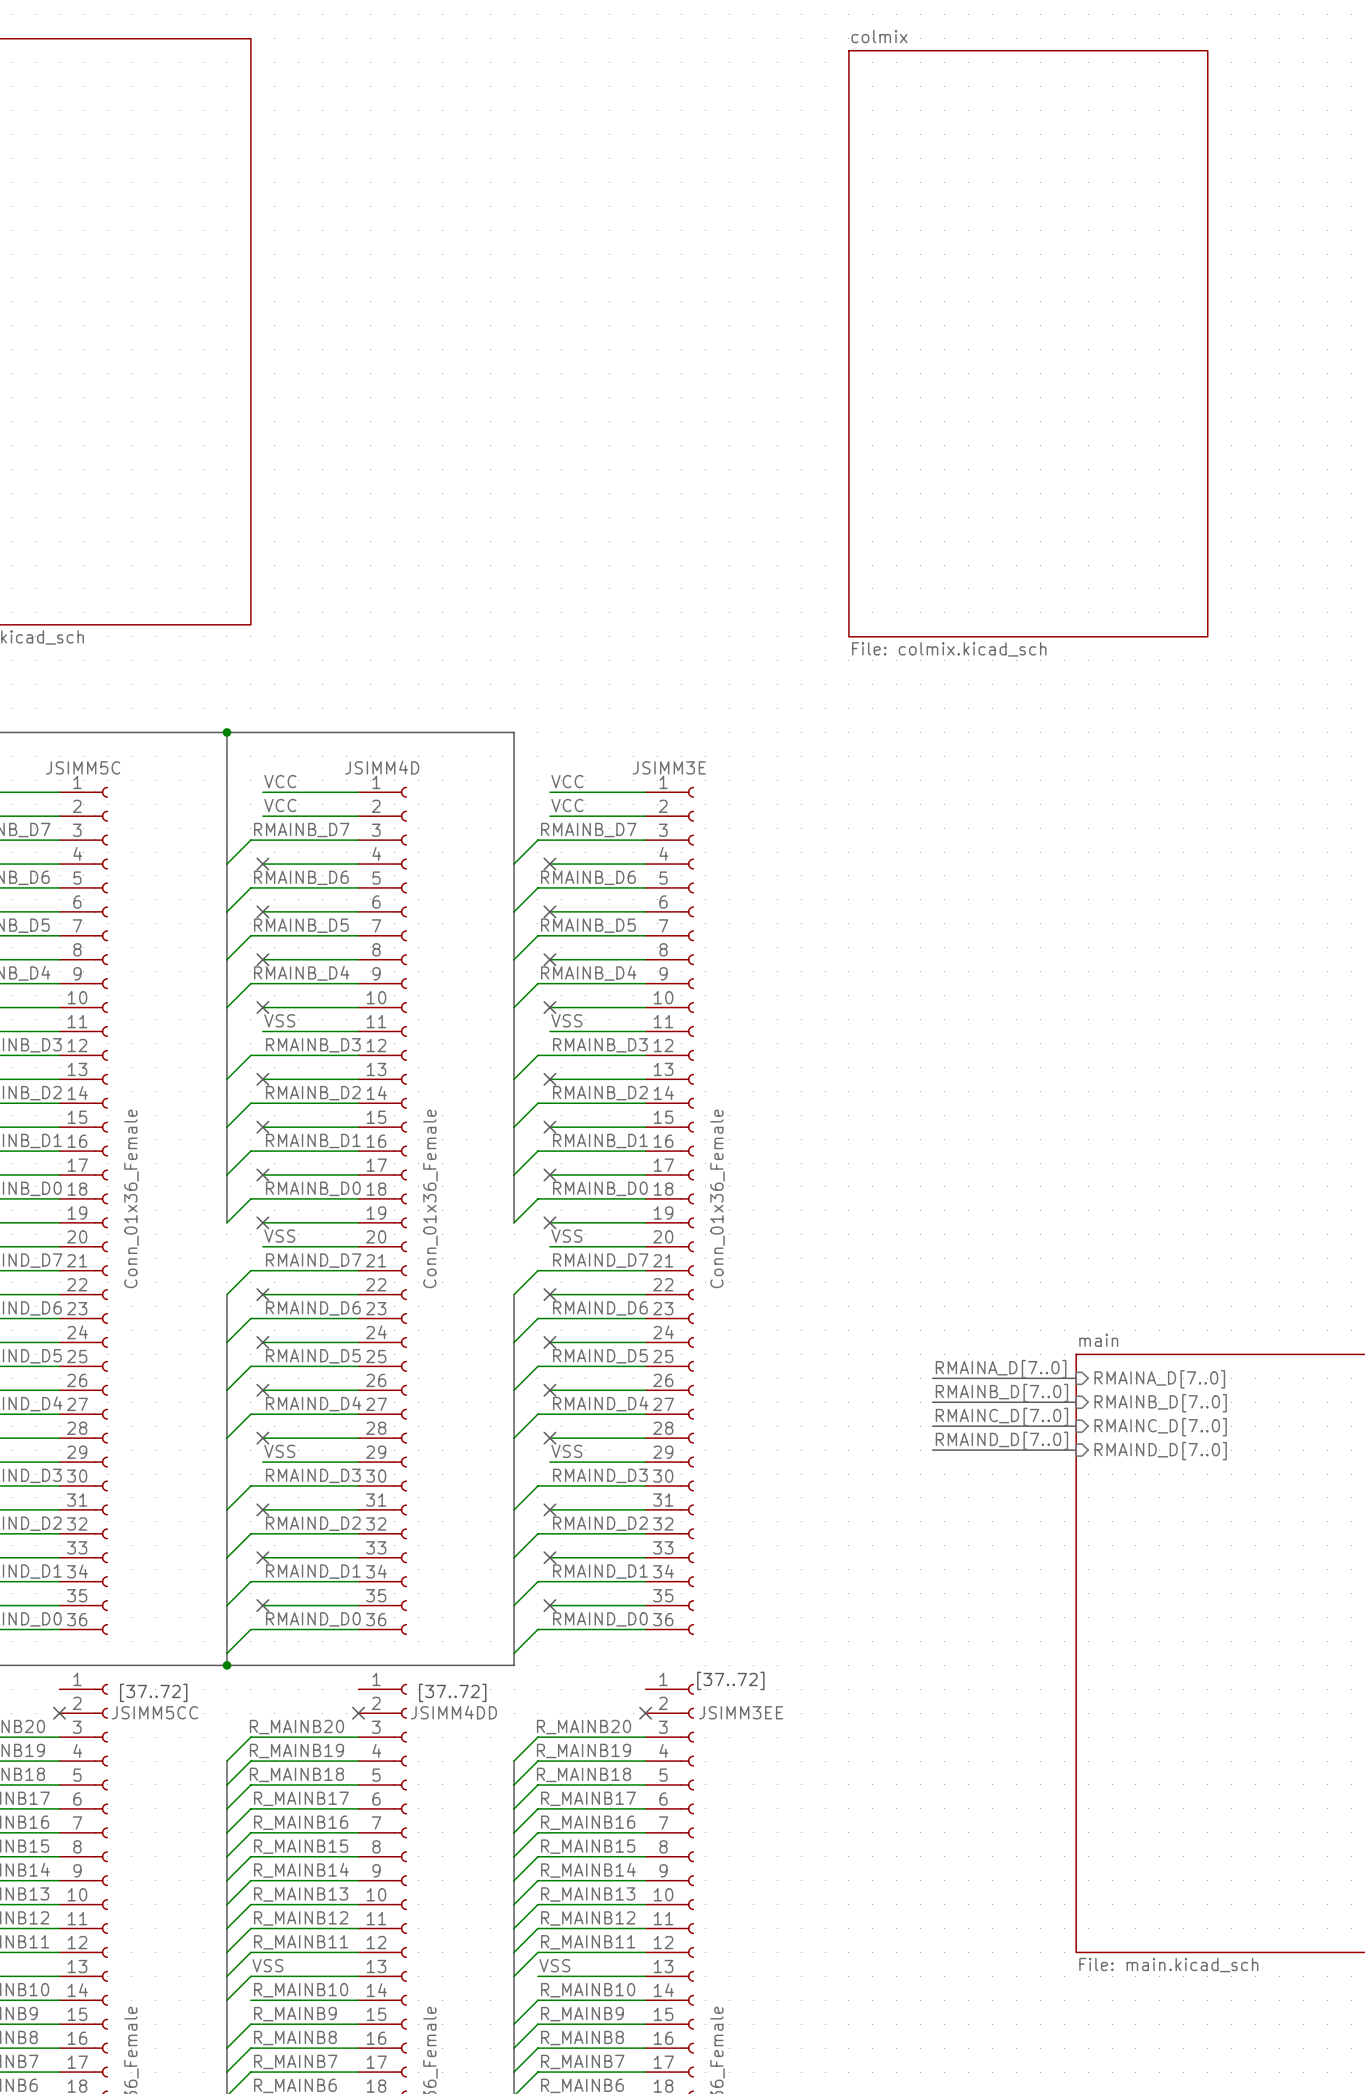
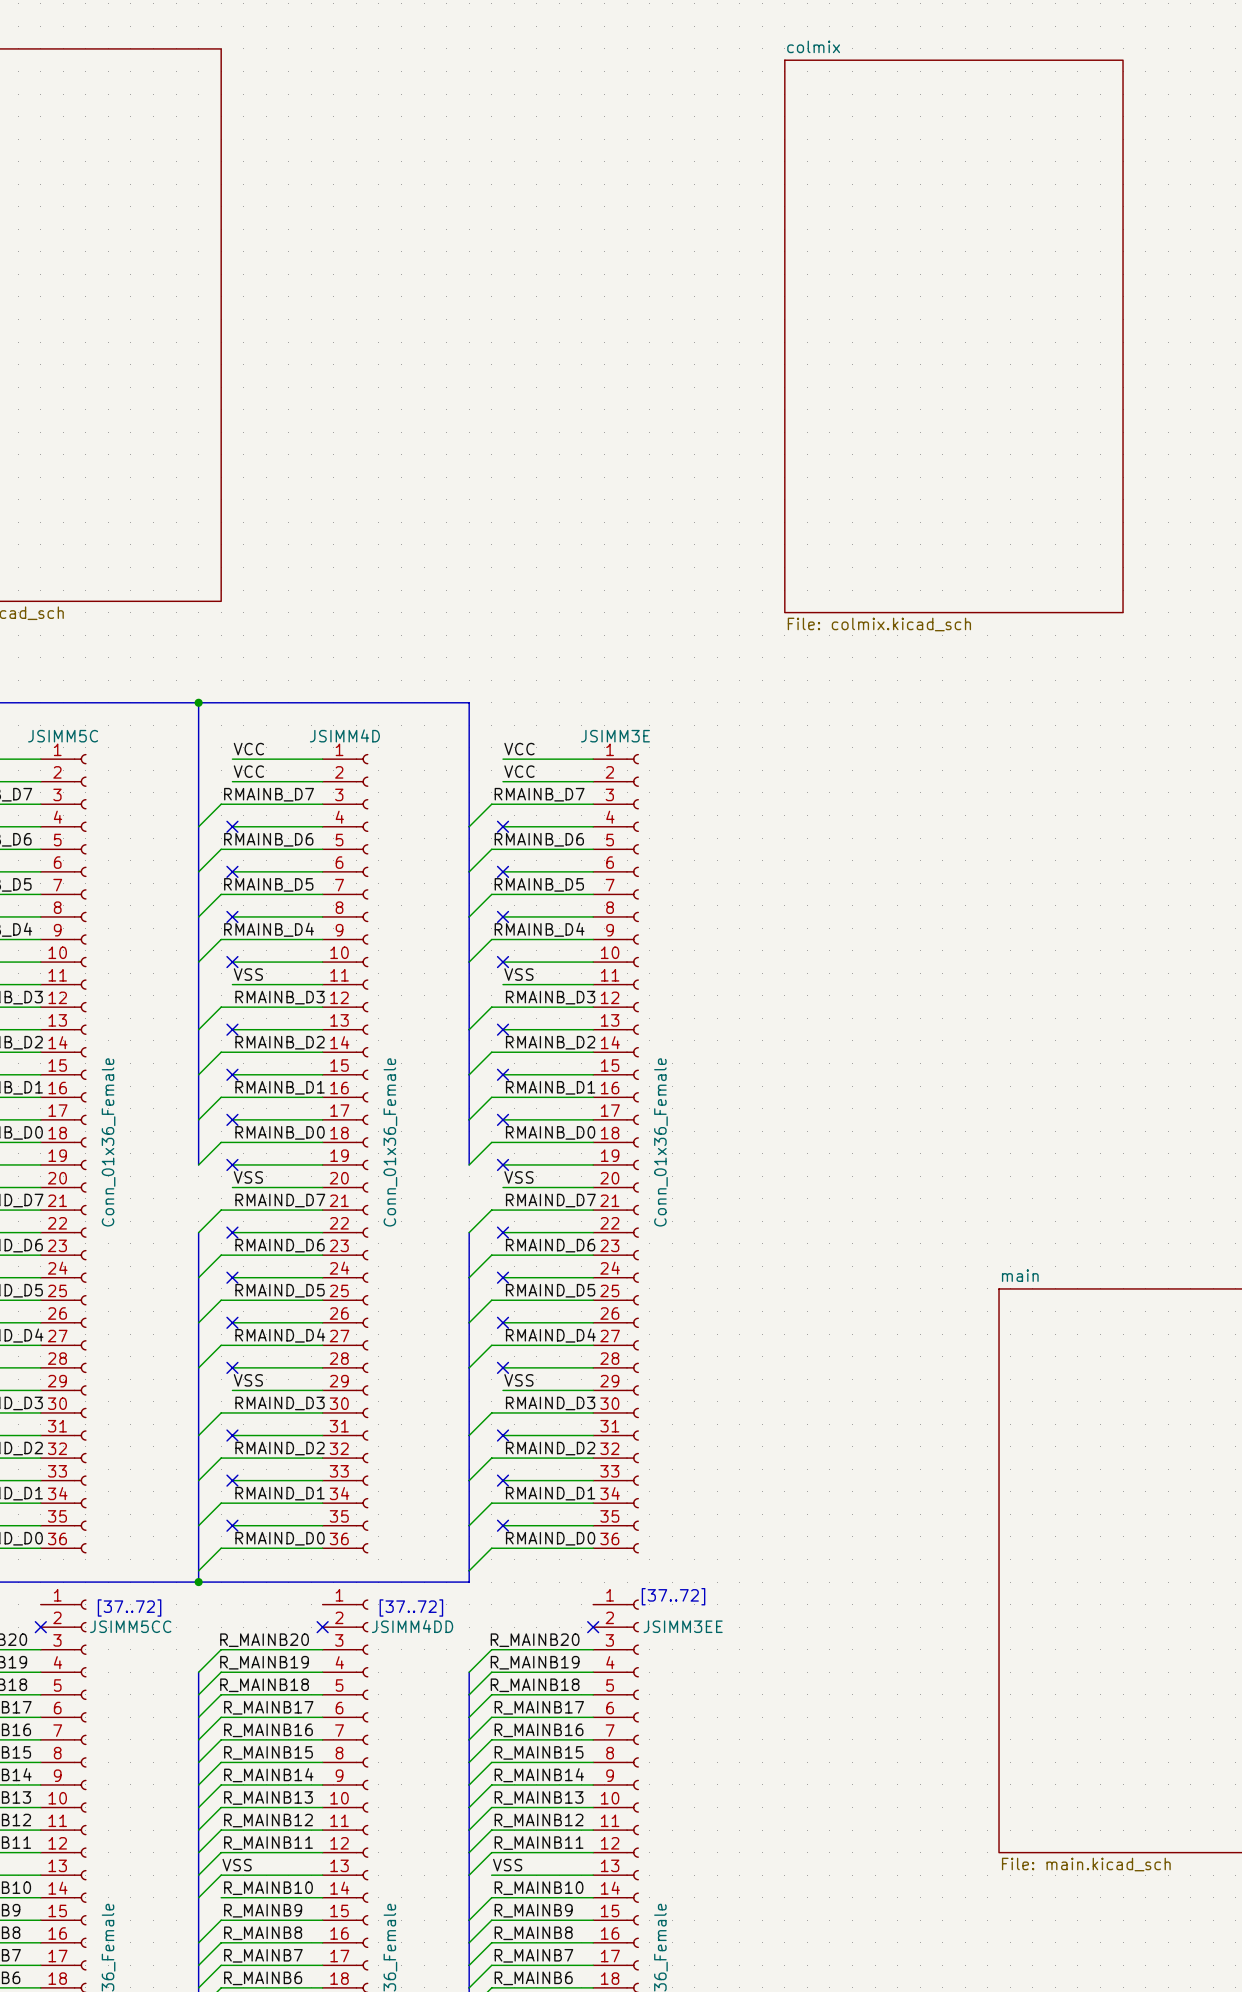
label: RMAINA_D[7..0] (1001, 1369) -> none
bus: (932, 1378) (1076, 1378) -> none
sheet pin: RMAINA_D[7..0] (1159, 1379) -> none
label: RMAINB_D[7..0] (1001, 1393) -> none
bus: (932, 1402) (1076, 1402) -> none
sheet pin: RMAINB_D[7..0] (1160, 1403) -> none
label: RMAINC_D[7..0] (1001, 1416) -> none
bus: (932, 1426) (1076, 1426) -> none
sheet pin: RMAINC_D[7..0] (1160, 1427) -> none
label: RMAIND_D[7..0] (1001, 1440) -> none
bus: (932, 1450) (1076, 1450) -> none
sheet pin: RMAIND_D[7..0] (1160, 1451) -> none

